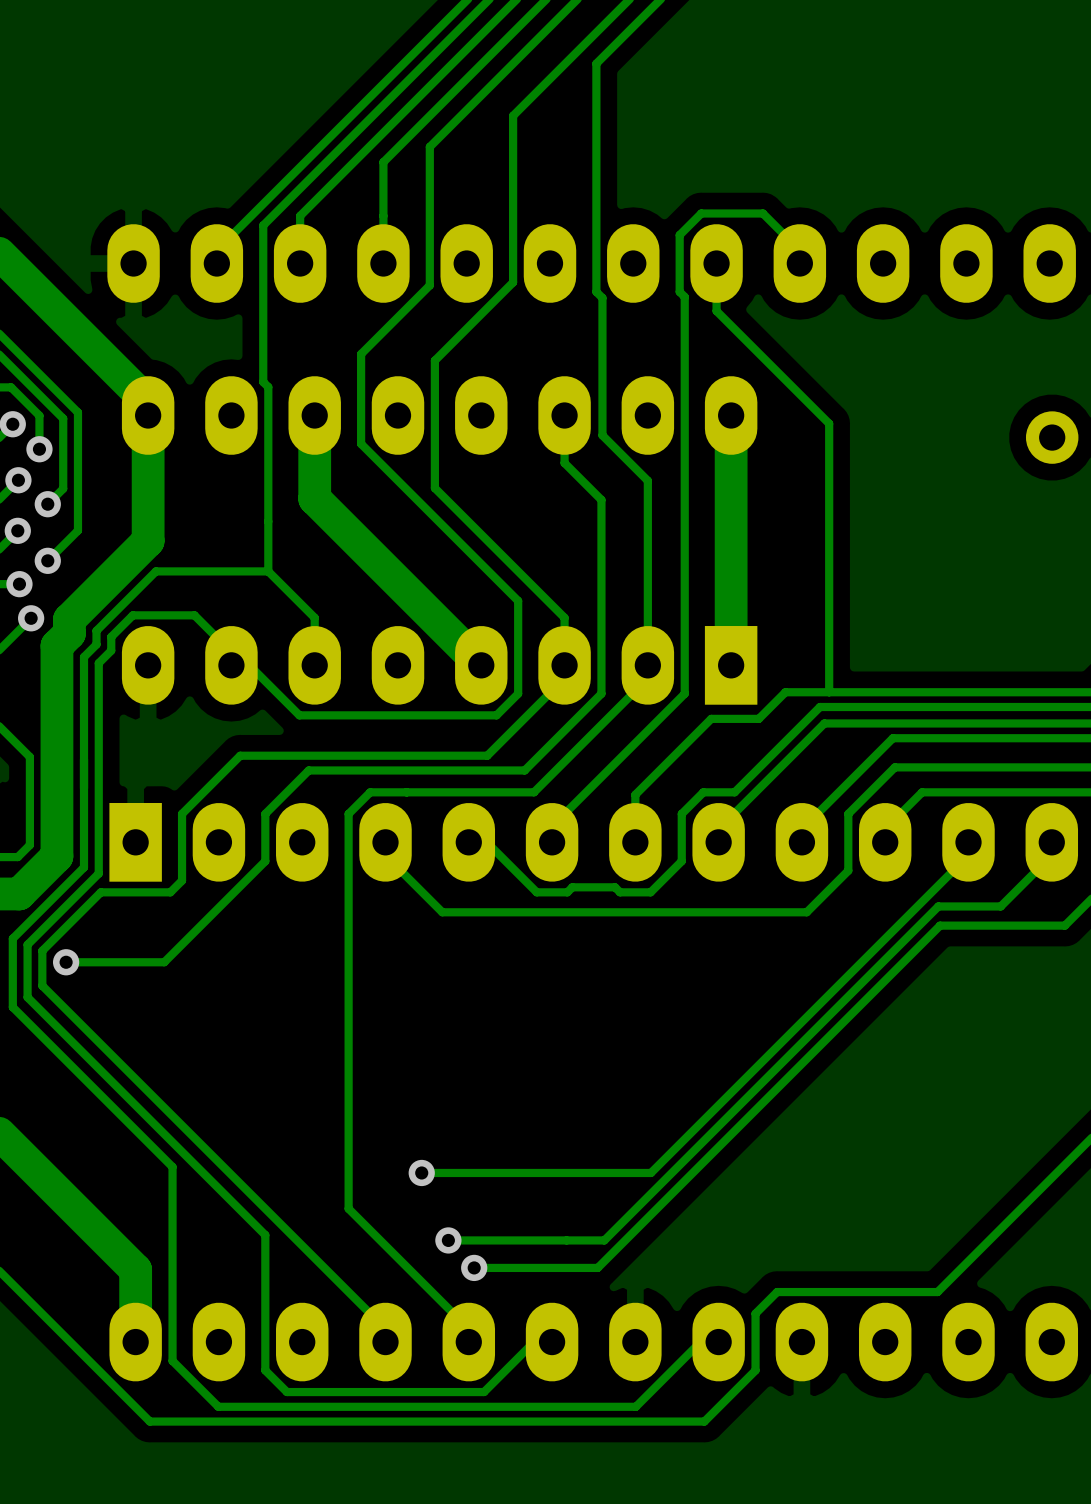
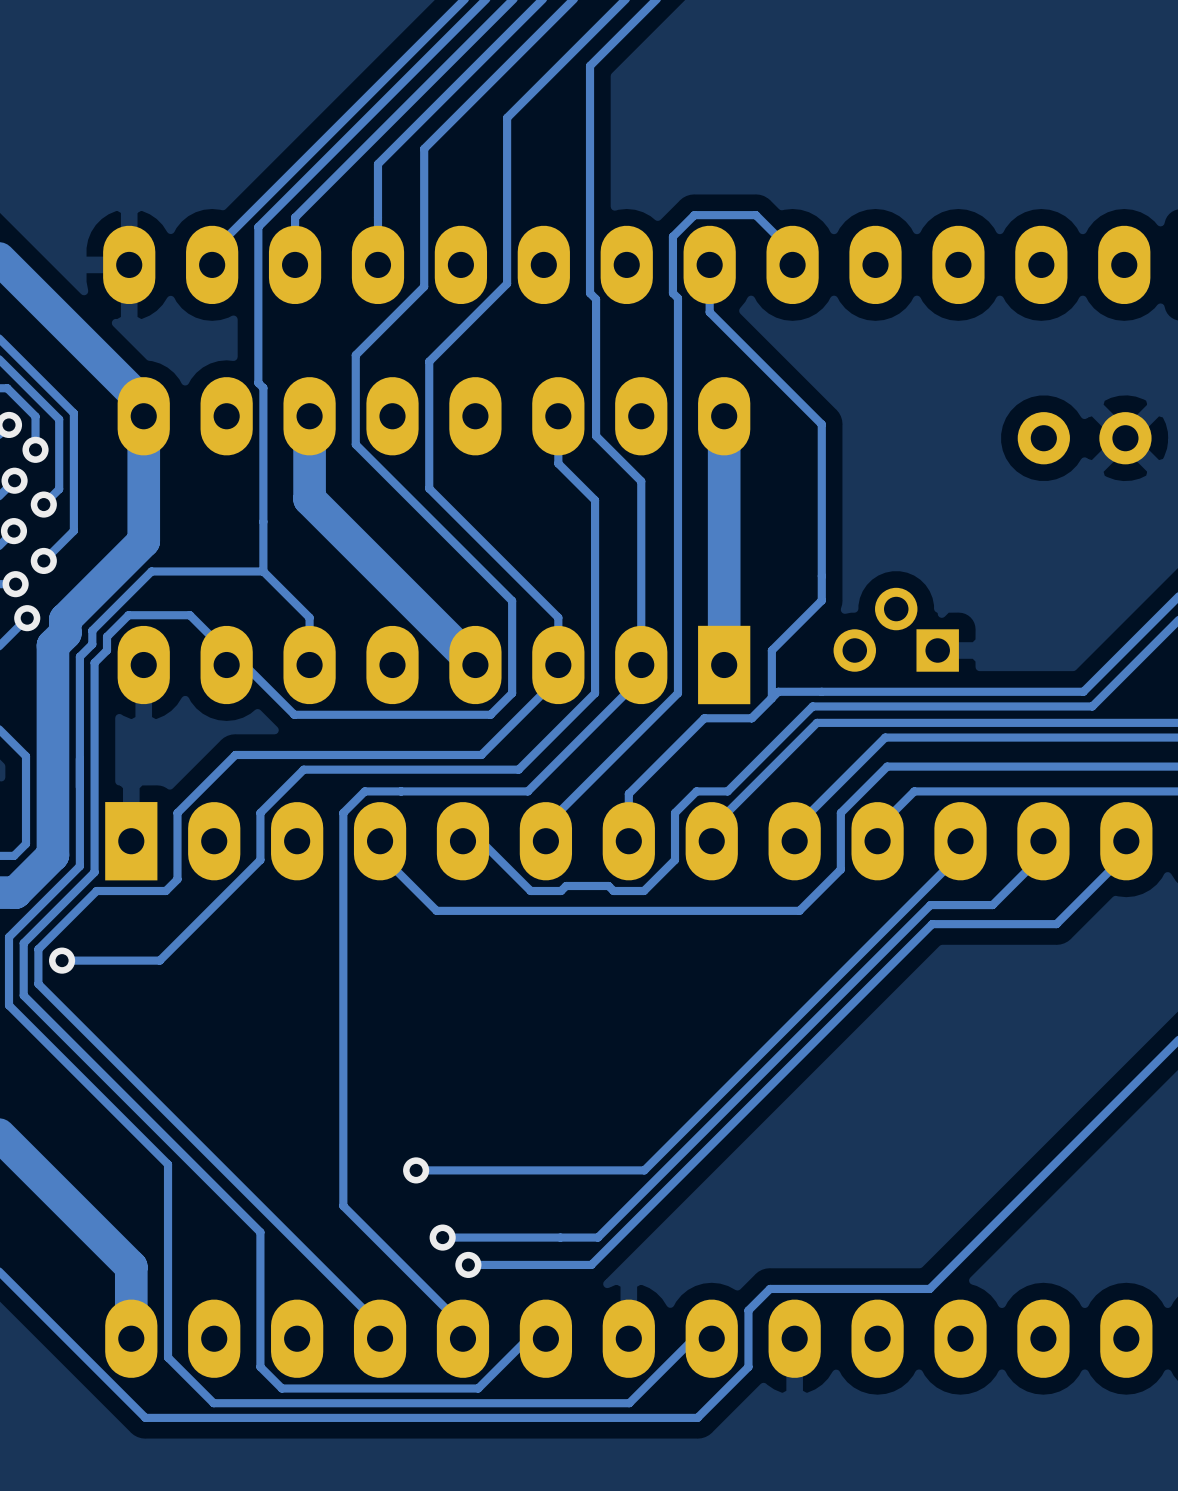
track: (829, 600) (829, 692) -> (821, 600) (771, 650) (771, 698)
part: none -> (896, 629)

